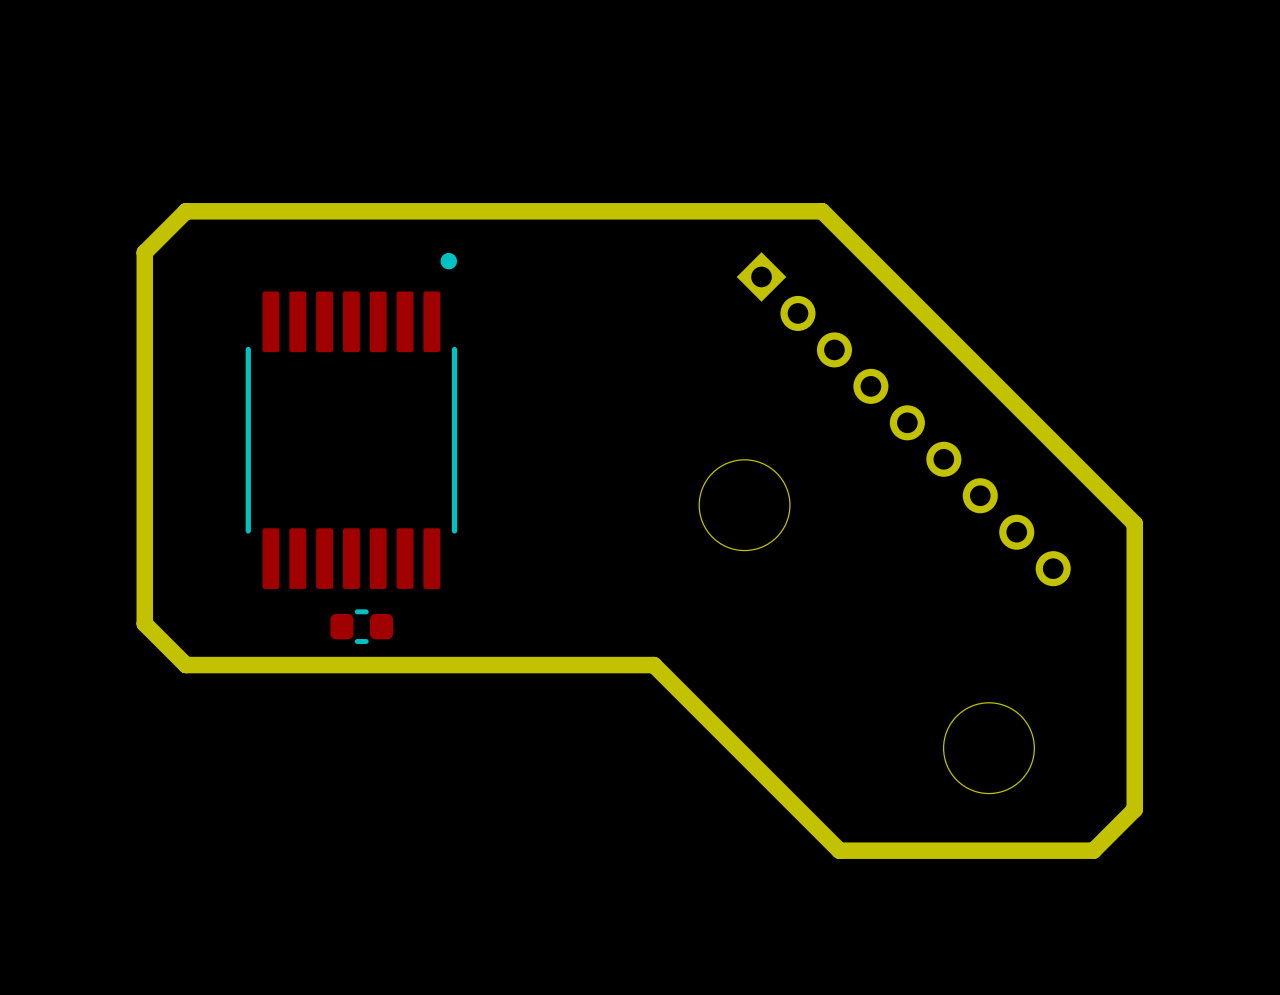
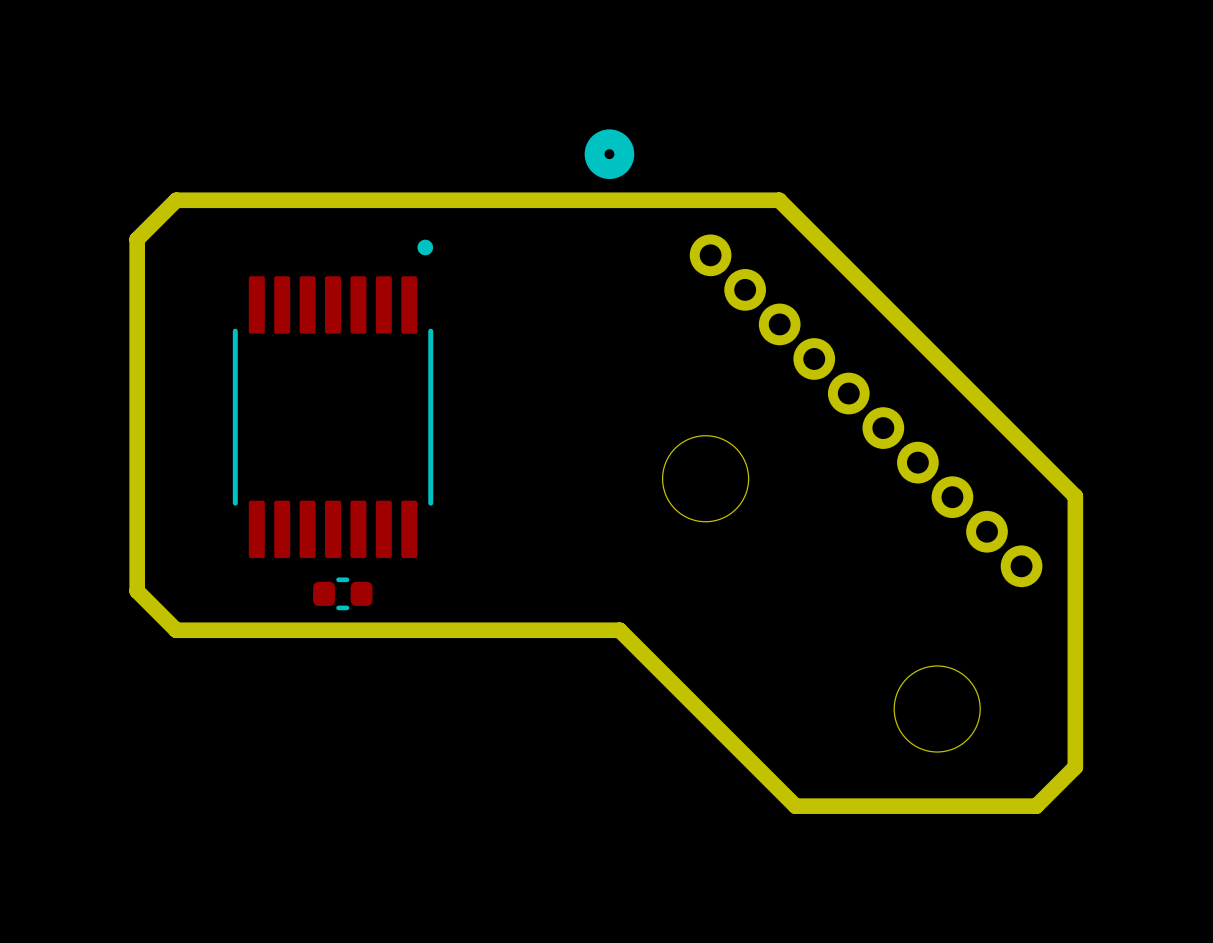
part: none -> (813, 358)
part: (903, 419) -> none

